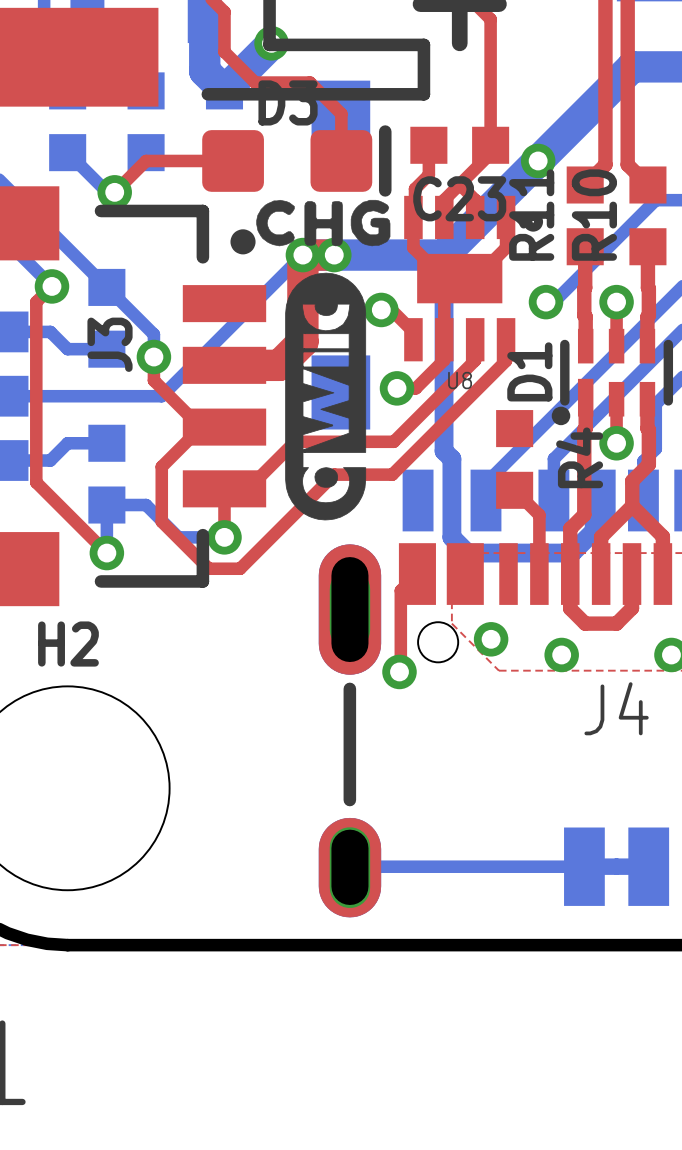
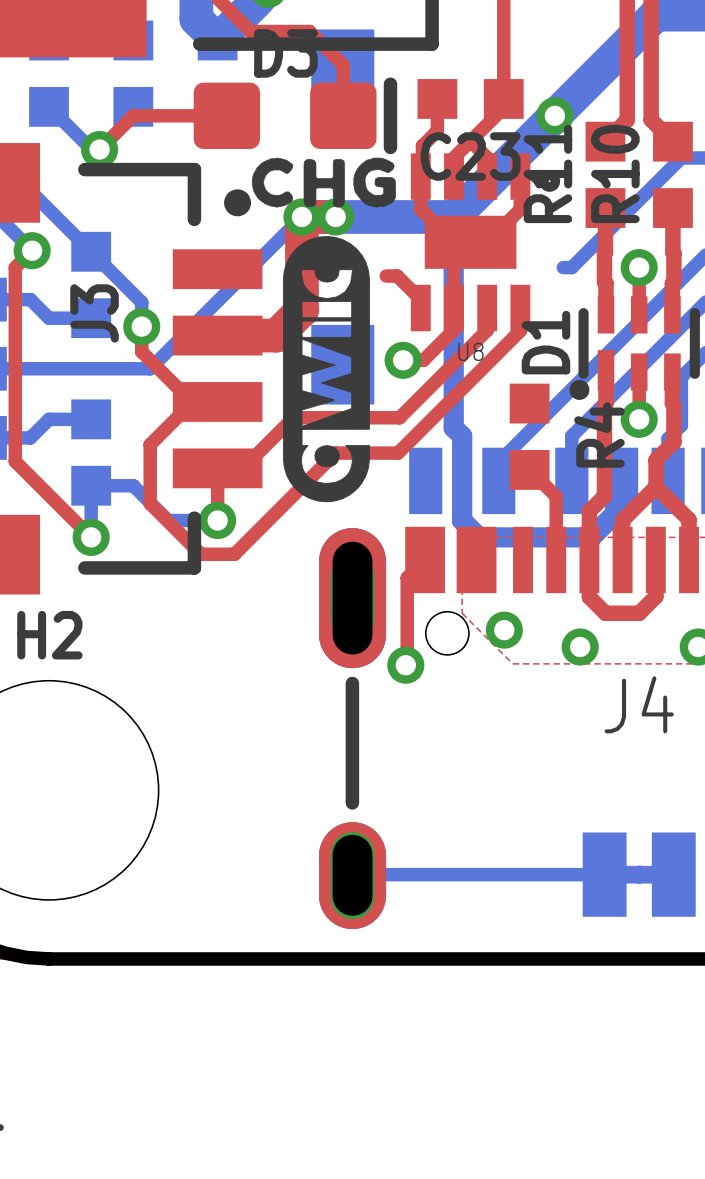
via: (546, 302) -> none
via: (381, 309) -> none

